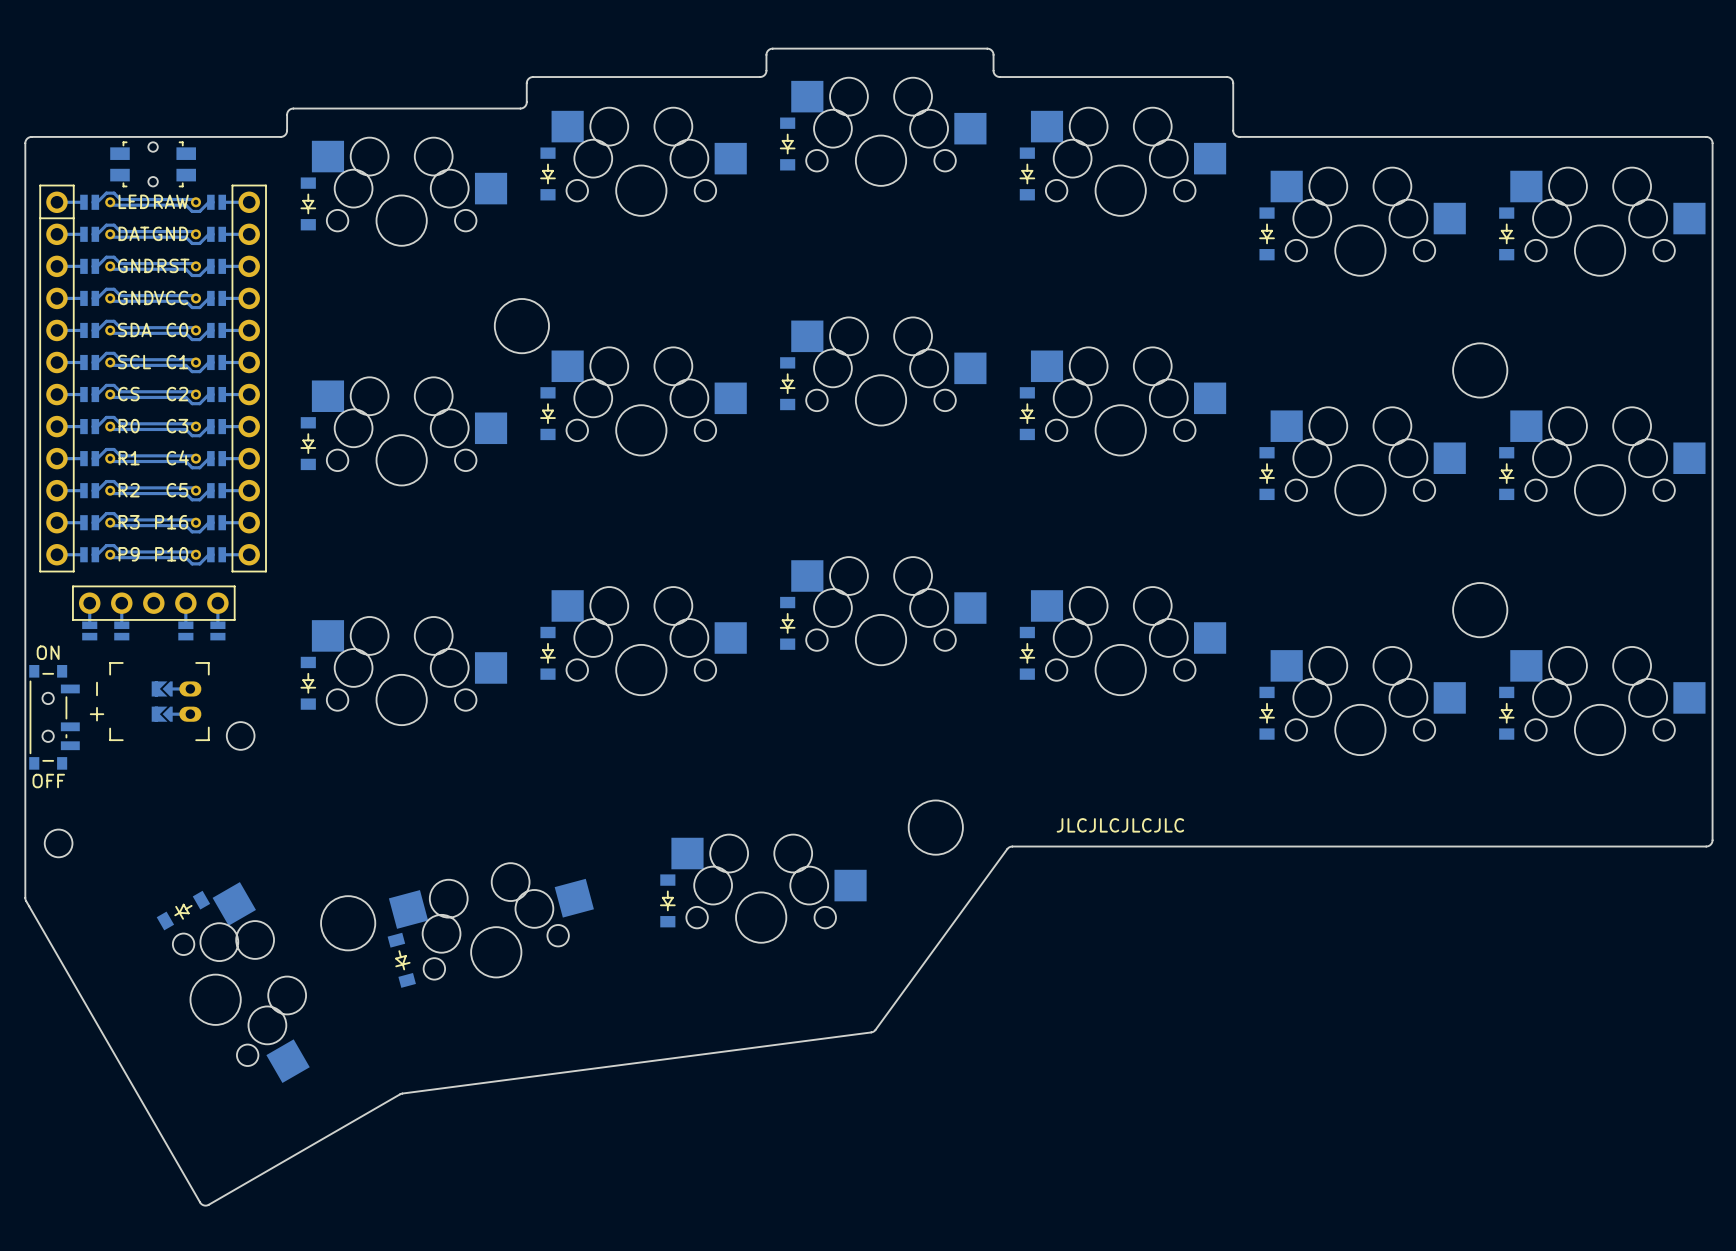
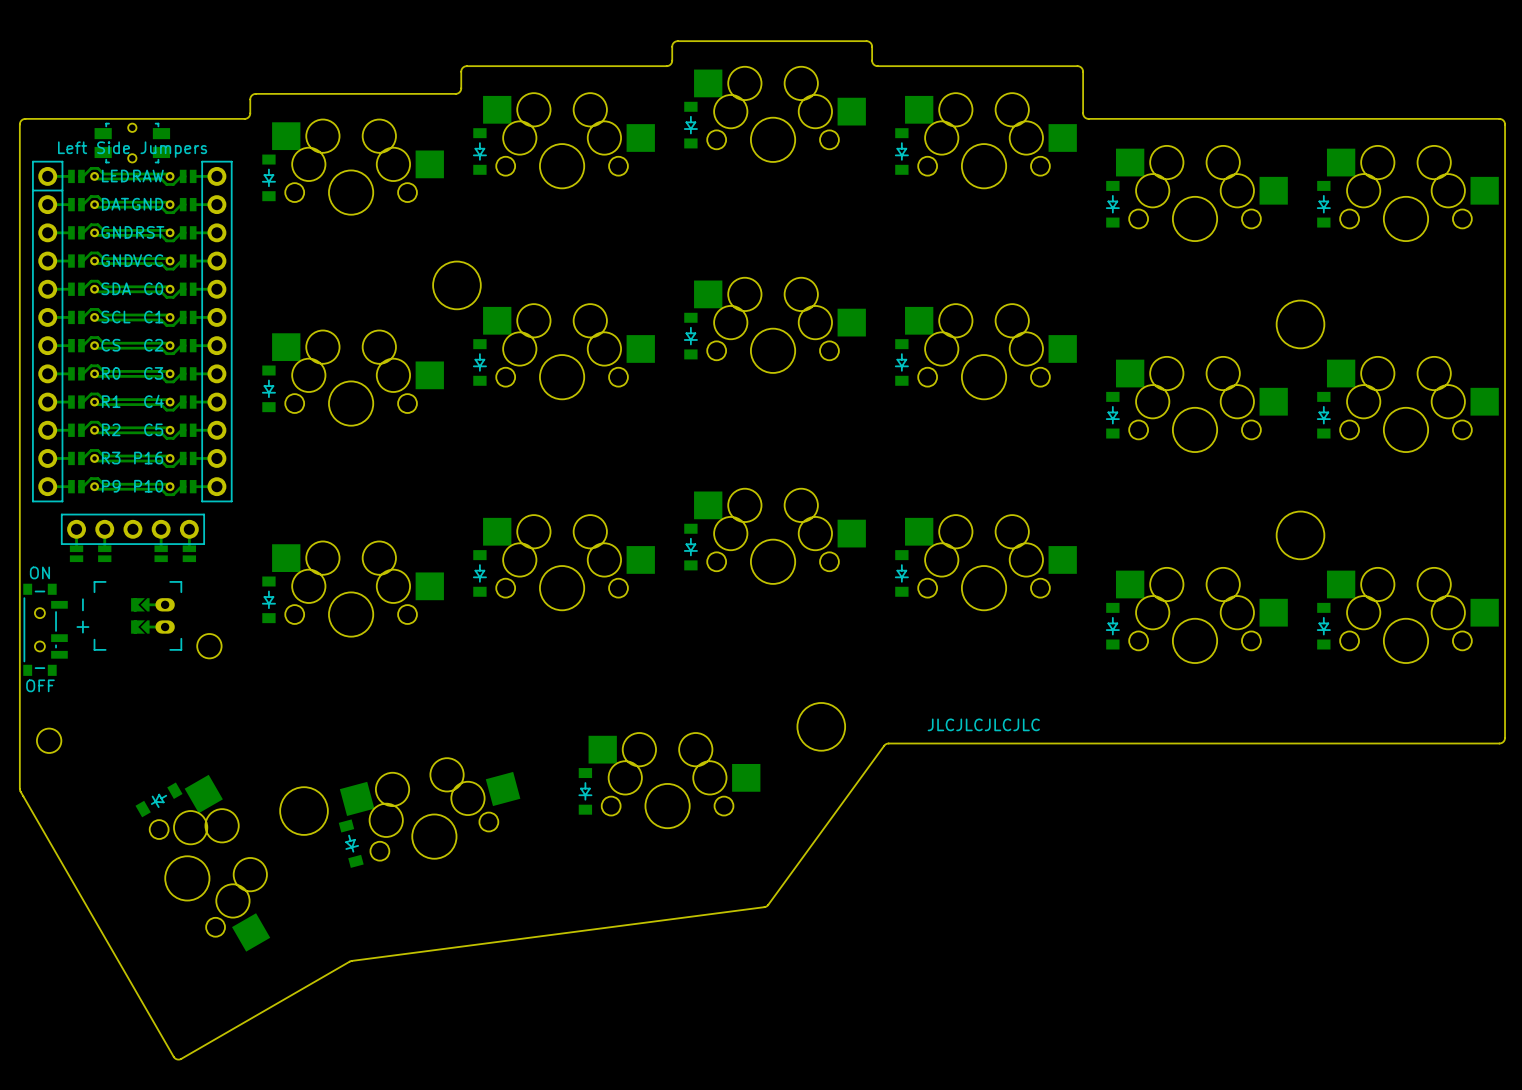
part text: none -> Left Side Jumpers (132, 149)

